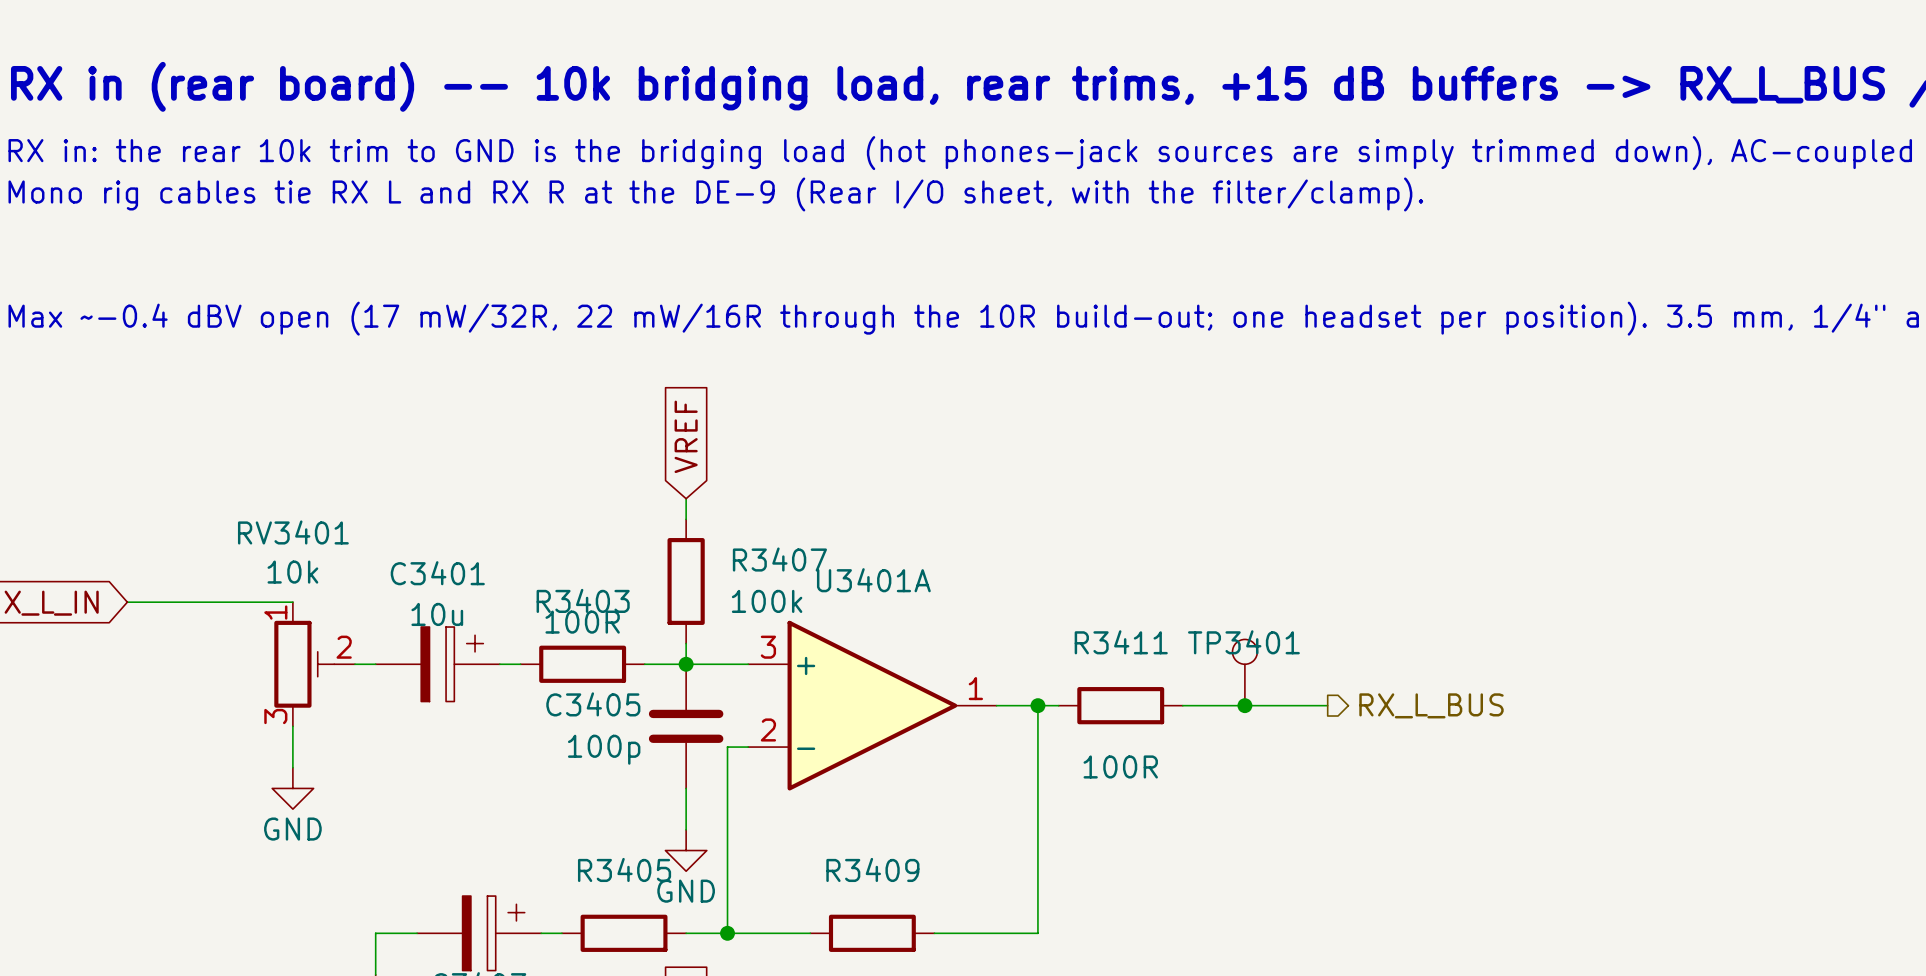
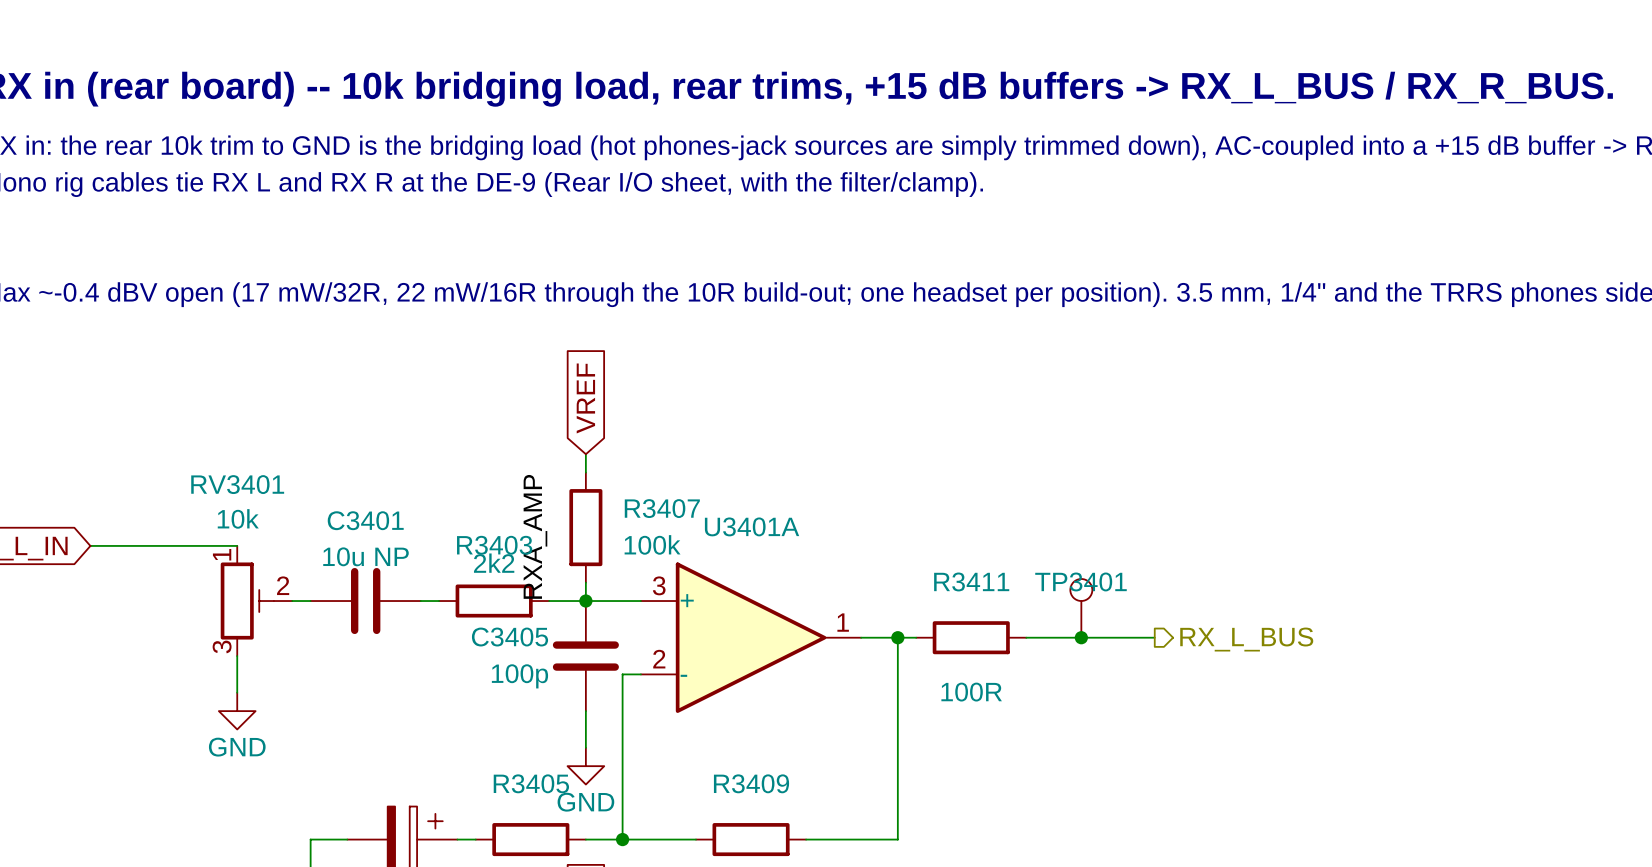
label: none -> RXA_AMP (535, 536)
C3401 value: 10u (437, 614) -> 10u NP (366, 556)
R3403 value: 100R (582, 622) -> 2k2 (494, 563)
C3401 symbol: [375, 627, 500, 702] -> [310, 567, 421, 635]

